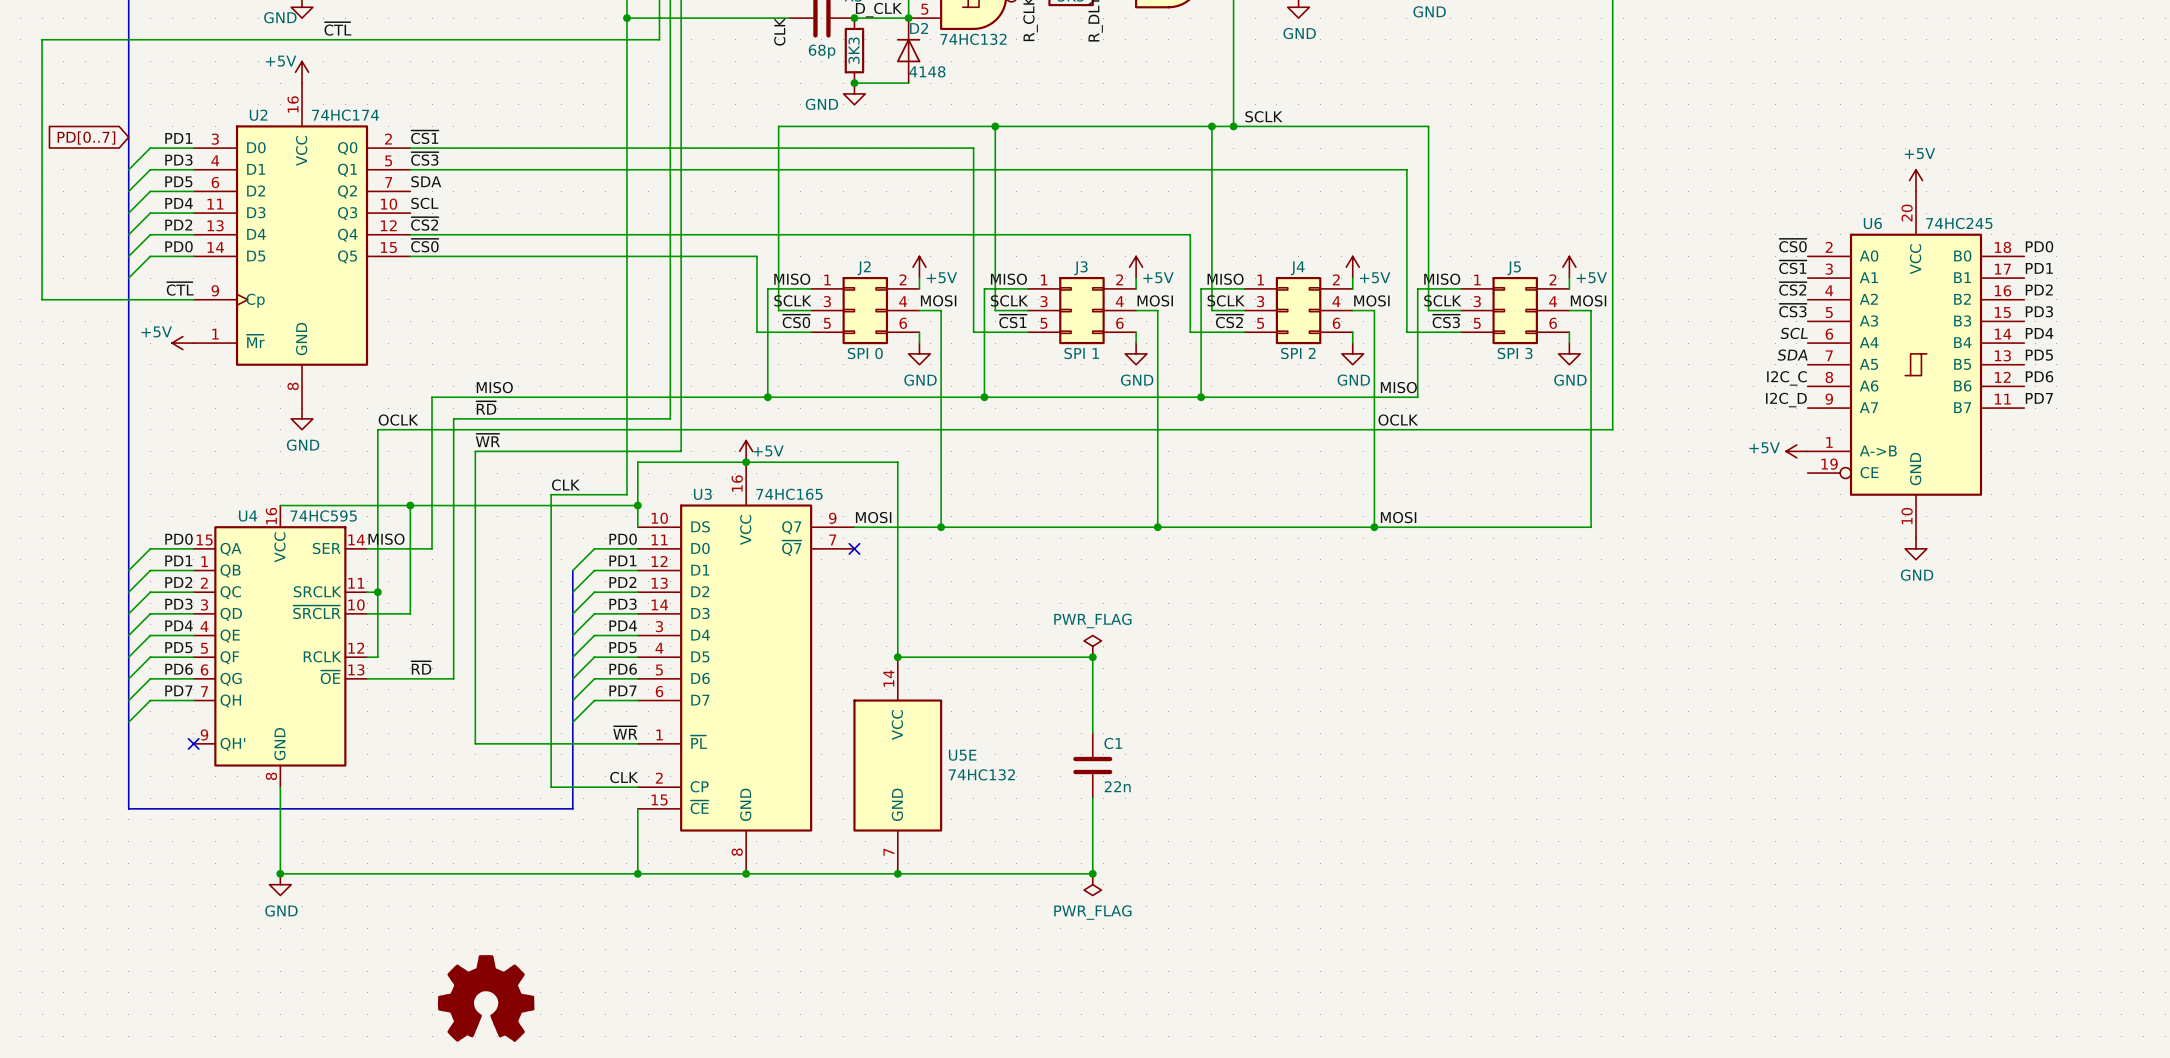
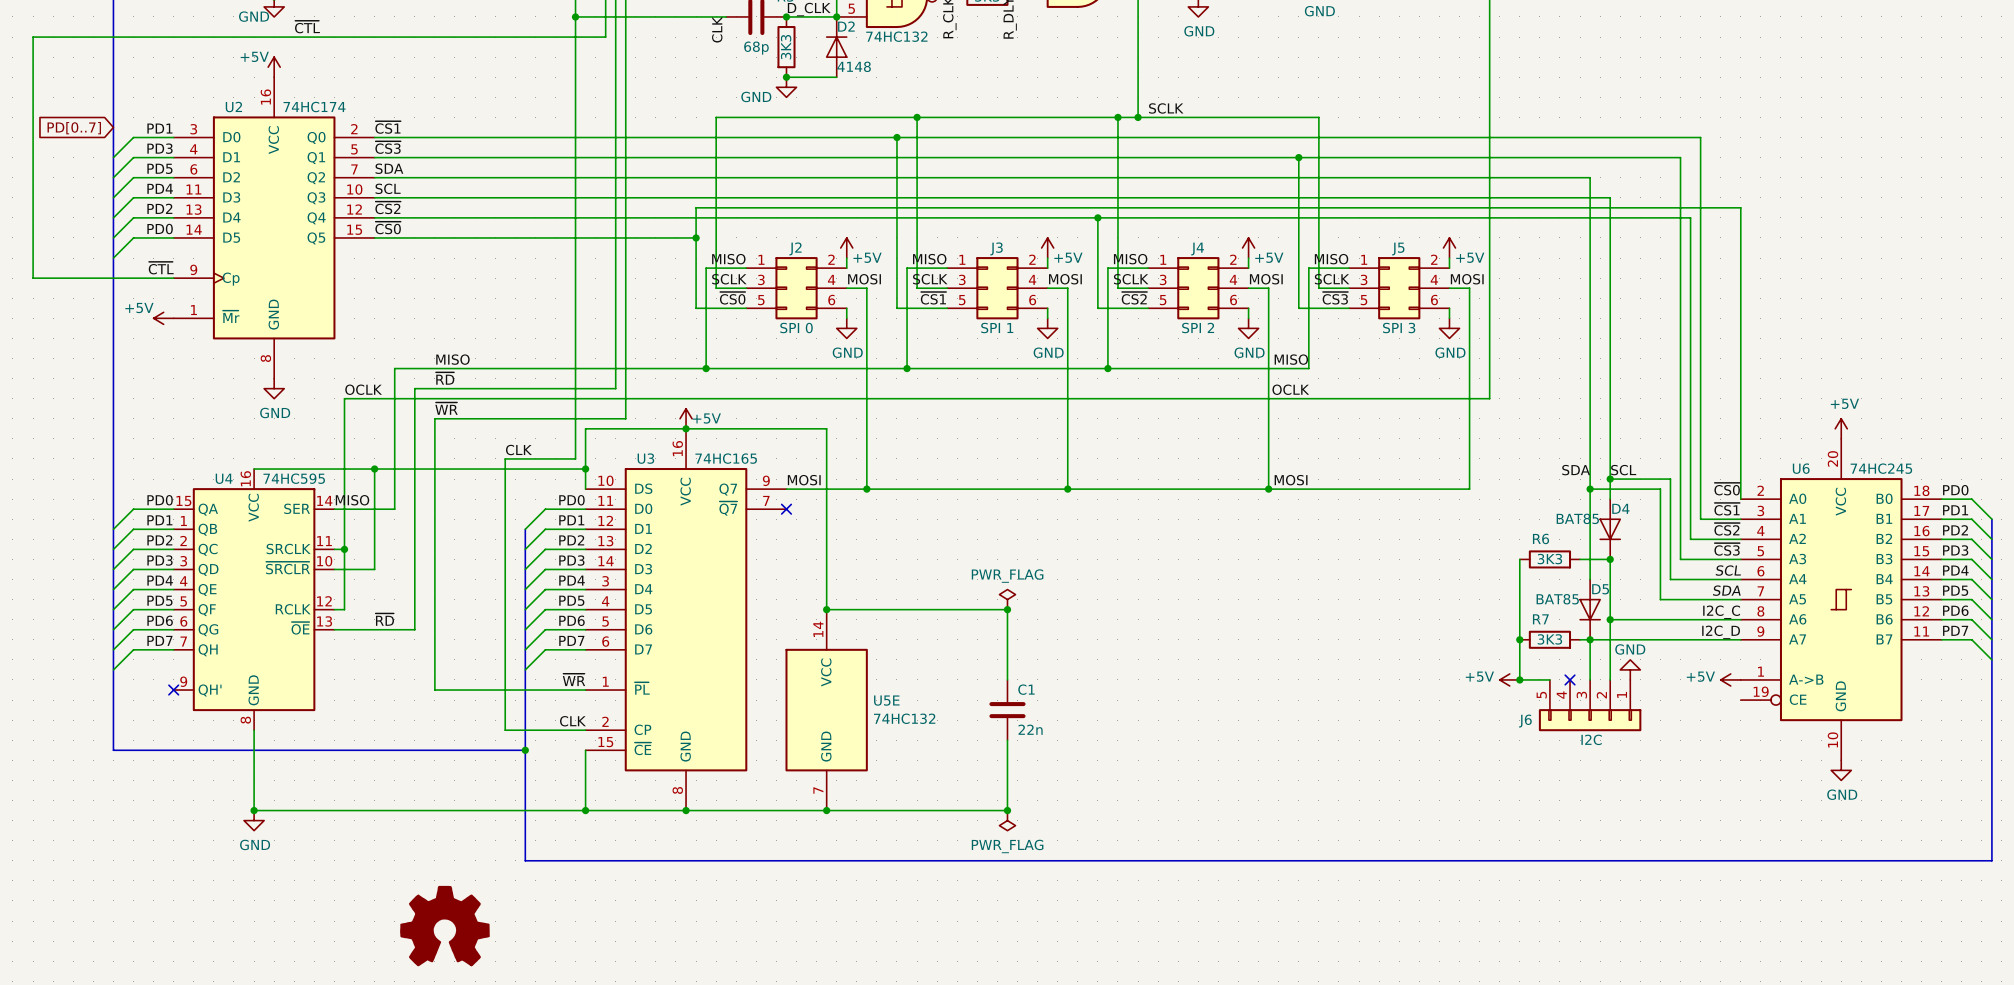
wire: none -> (896, 137) (1700, 137) (1700, 519) (1740, 519)
junction: none -> (896, 137)
wire: none -> (1298, 157) (1680, 157) (1680, 559) (1740, 559)
junction: none -> (1298, 157)
power symbol: +5V (1916, 180) -> none
wire: none -> (374, 177) (1590, 177) (1590, 579)
wire: none -> (374, 197) (1610, 197) (1610, 499)
wire: none -> (1097, 217) (1690, 217) (1690, 539) (1740, 539)
junction: none -> (1097, 217)
label: ~{CS0} (1792, 245) -> none
label: PD0 (2039, 246) -> none
wire: none -> (696, 237) (696, 207) (1740, 207) (1740, 499)
junction: none -> (696, 237)
label: ~{CS1} (1792, 267) -> none
label: PD1 (2039, 268) -> none
label: ~{CS2} (1792, 288) -> none
label: PD2 (2039, 289) -> none
label: ~{CS3} (1792, 310) -> none
label: PD3 (2039, 311) -> none
label: SCL (1794, 333) -> none
label: PD4 (2039, 333) -> none
label: SDA (1792, 355) -> none
label: PD5 (2039, 355) -> none
U6 position: (1916, 364) -> (1841, 599)
label: PD6 (2039, 376) -> none
label: I2C_C (1787, 378) -> none
label: PD7 (2039, 398) -> none
label: I2C_D (1786, 400) -> none
power symbol: +5V (1796, 451) -> none
power symbol: none -> +5V (1841, 428)
label: none -> SDA (1576, 470)
label: none -> SCL (1623, 470)
wire: none -> (1610, 479) (1670, 479) (1670, 579) (1740, 579)
junction: none -> (1610, 479)
wire: none -> (1590, 489) (1660, 489) (1660, 599) (1740, 599)
junction: none -> (1590, 489)
label: none -> ~{CS0} (1727, 489)
label: none -> PD0 (1955, 490)
wire: none -> (1941, 499) (1971, 499) (1991, 519)
label: none -> ~{CS1} (1727, 509)
power symbol: GND (1916, 548) -> none
label: none -> PD1 (1955, 510)
wire: none -> (1941, 519) (1971, 519) (1991, 539)
bus: none -> (1991, 519) (1991, 860) (525, 860) (525, 750)
D4: none -> BAT85 (1610, 529)
label: none -> ~{CS2} (1727, 529)
label: none -> PD2 (1955, 530)
wire: none -> (1941, 539) (1971, 539) (1991, 559)
label: none -> ~{CS3} (1727, 549)
label: none -> PD3 (1955, 550)
wire: none -> (1519, 559) (1519, 679) (1549, 679)
R6: none -> 3K3 (1549, 559)
wire: none -> (1580, 559) (1610, 559) (1610, 679)
junction: none -> (1610, 559)
wire: none -> (1941, 559) (1971, 559) (1991, 579)
label: none -> SCL (1728, 570)
label: none -> PD4 (1955, 570)
wire: none -> (1941, 579) (1971, 579) (1991, 599)
label: none -> SDA (1726, 590)
label: none -> PD5 (1955, 590)
wire: none -> (1941, 599) (1971, 599) (1991, 619)
D5: none -> BAT85 (1590, 609)
label: none -> PD6 (1955, 610)
label: none -> I2C_C (1721, 612)
wire: none -> (1610, 619) (1740, 619)
junction: none -> (1610, 619)
wire: none -> (1941, 619) (1971, 619) (1991, 639)
label: none -> PD7 (1955, 630)
label: none -> I2C_D (1721, 632)
junction: none -> (1519, 639)
R7: none -> 3K3 (1549, 639)
wire: none -> (1580, 639) (1740, 639)
wire: none -> (1590, 639) (1590, 679)
junction: none -> (1590, 639)
wire: none -> (1941, 639) (1971, 639) (1991, 659)
power symbol: none -> GND (1630, 669)
power symbol: none -> +5V (1509, 679)
junction: none -> (1519, 679)
no-connect mark: none -> (1570, 679)
power symbol: none -> +5V (1730, 679)
J6: none -> I2C (1590, 705)
junction: none -> (525, 750)
power symbol: none -> GND (1841, 770)

